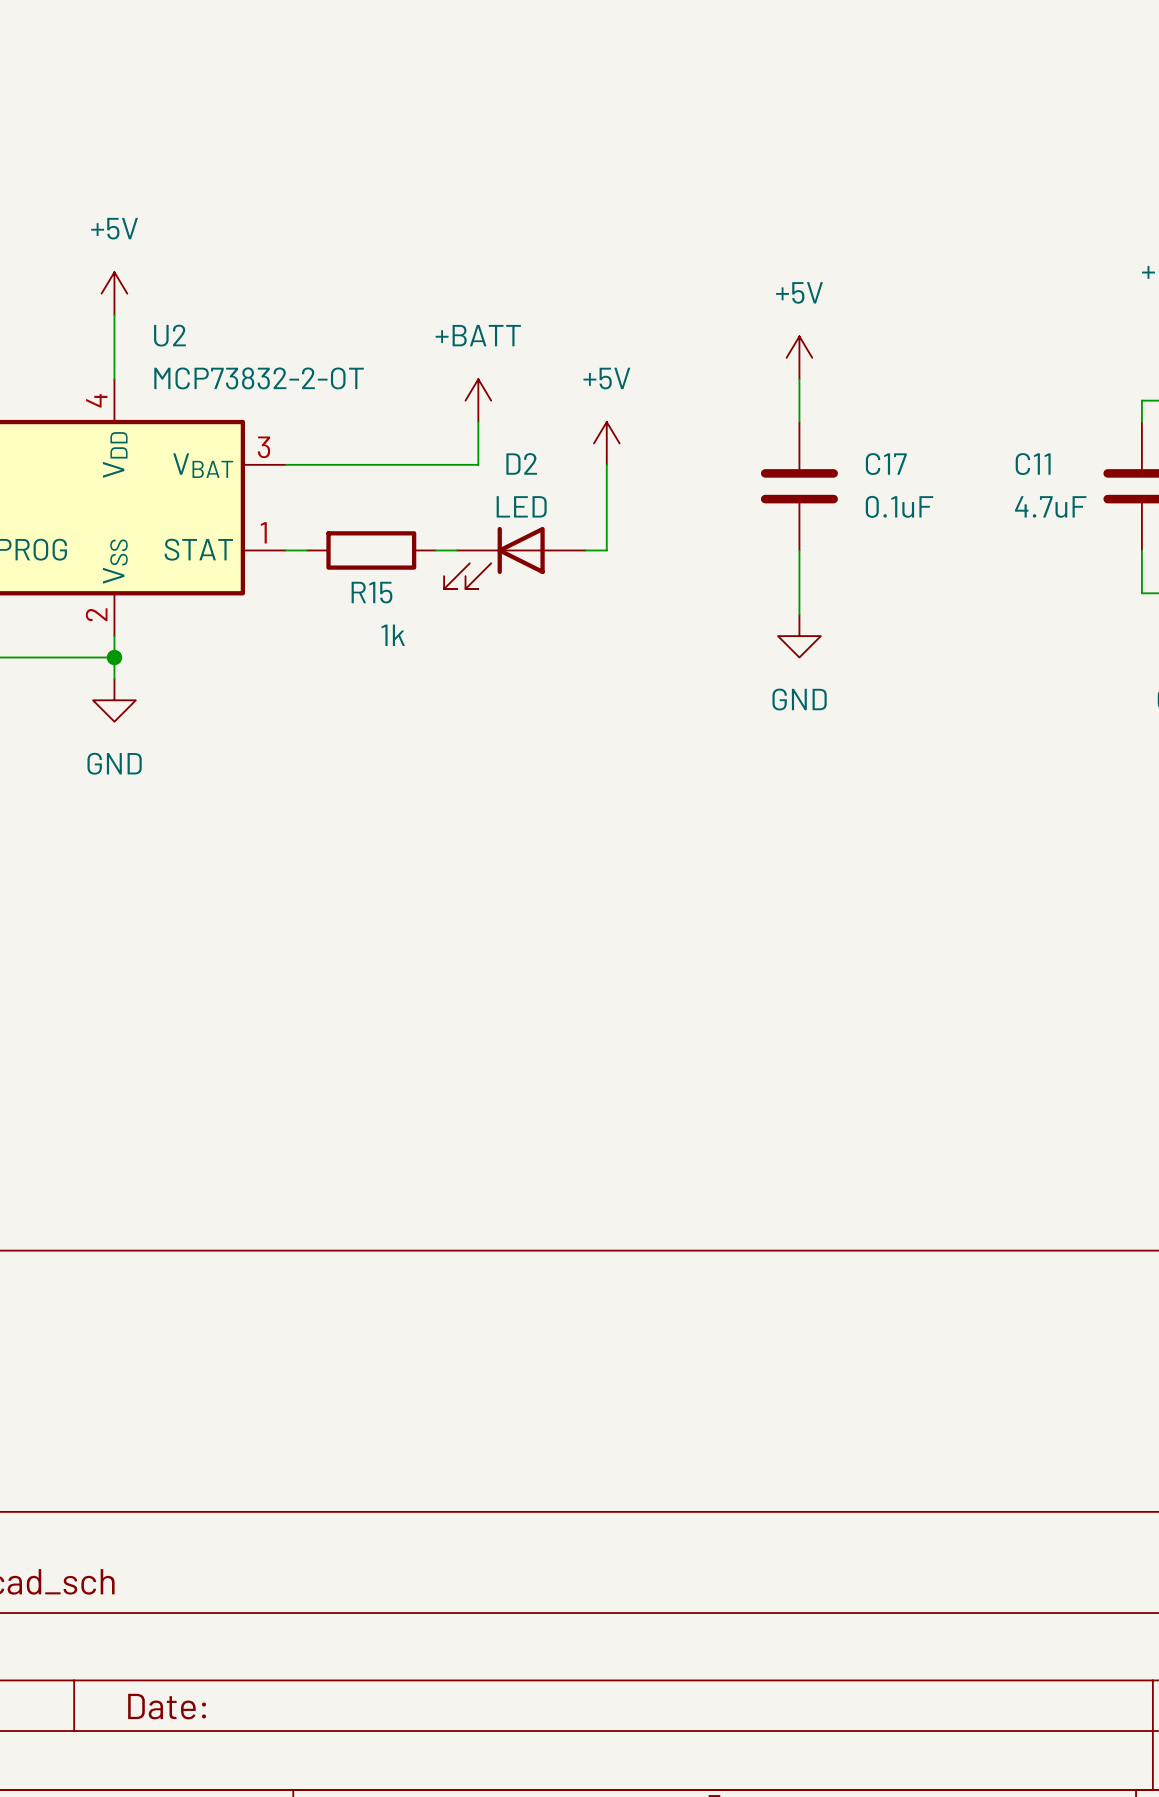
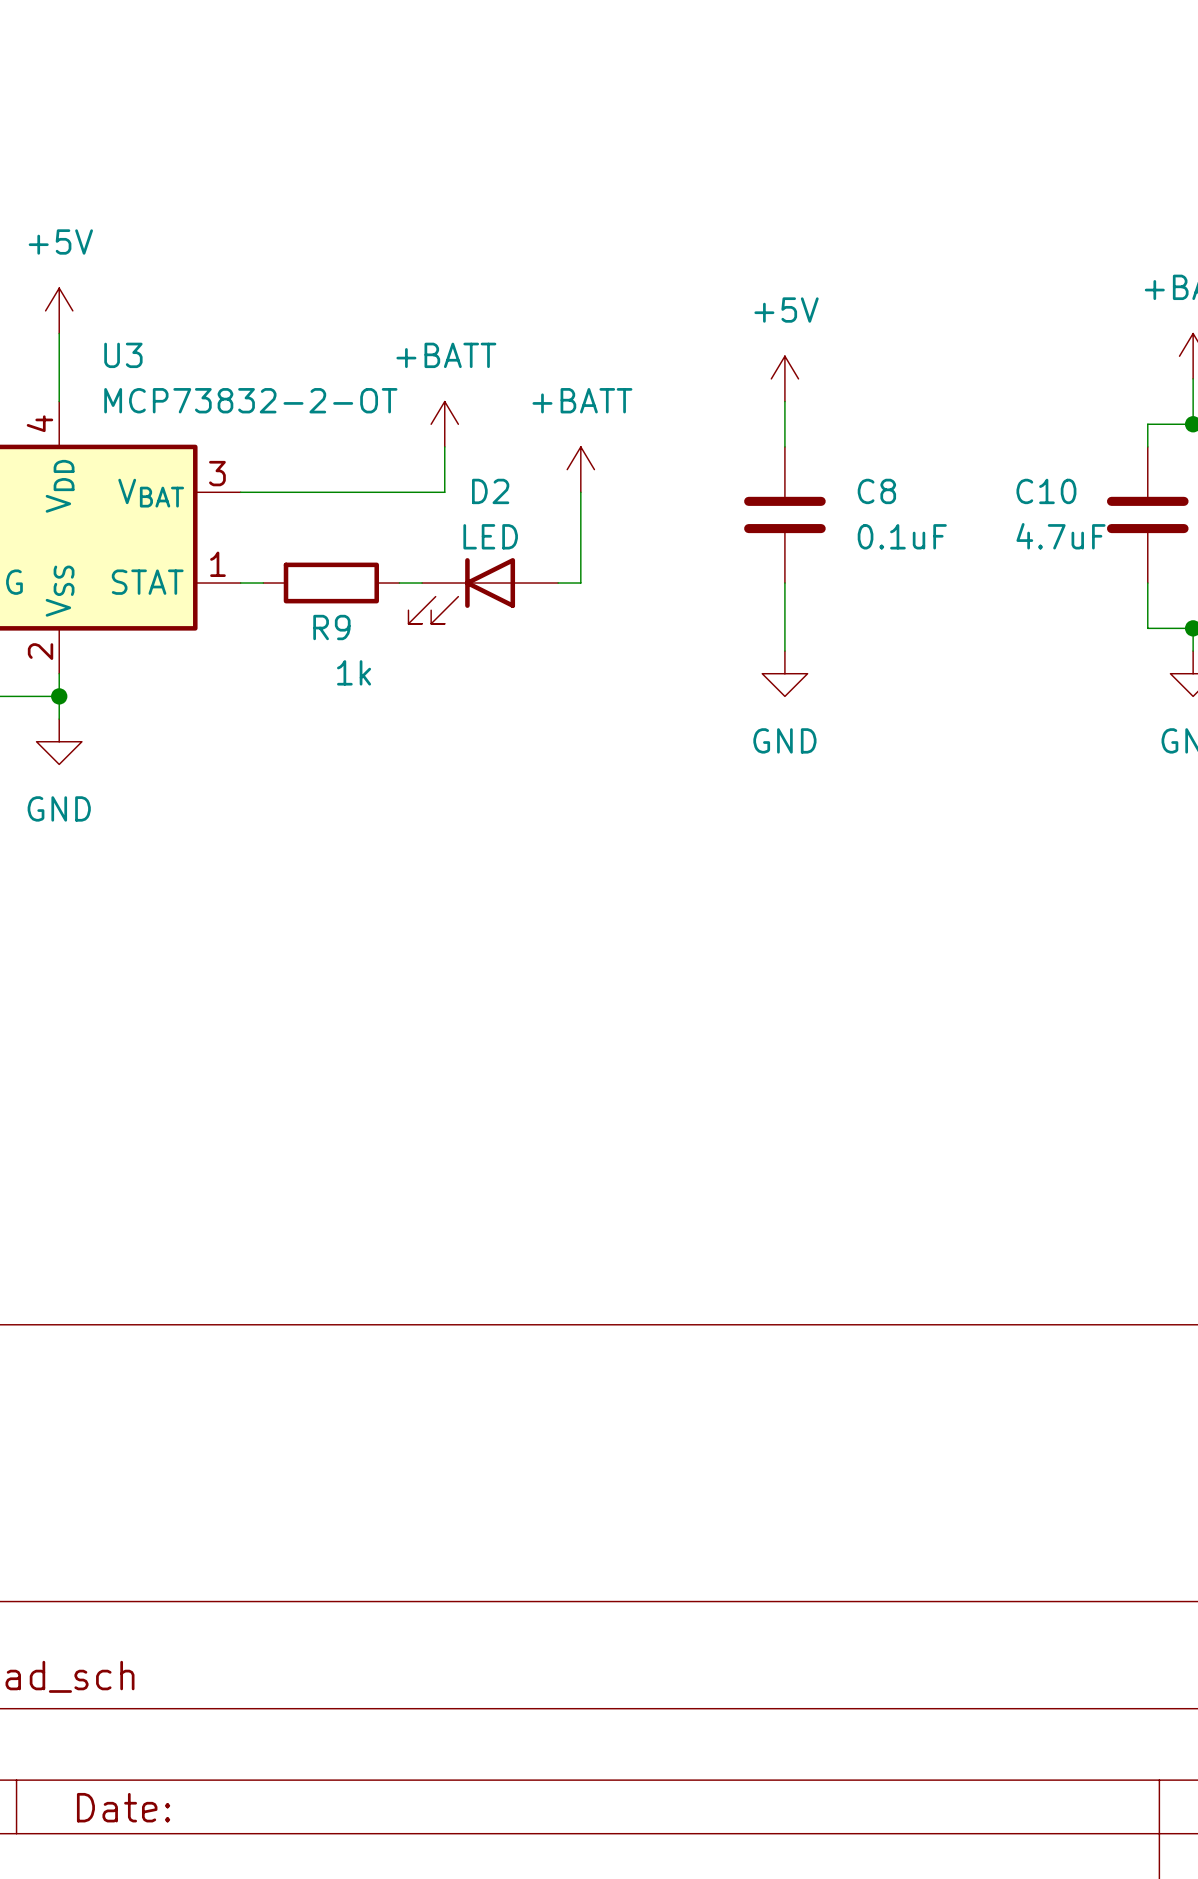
U2 name: U2 (169, 335) -> U3 (123, 355)
power symbol: +5V (606, 443) -> +BATT (580, 469)
C17 name: C17 (886, 464) -> C8 (876, 491)
C11 name: C11 (1033, 464) -> C10 (1046, 491)
R15 name: R15 (371, 592) -> R9 (331, 627)

